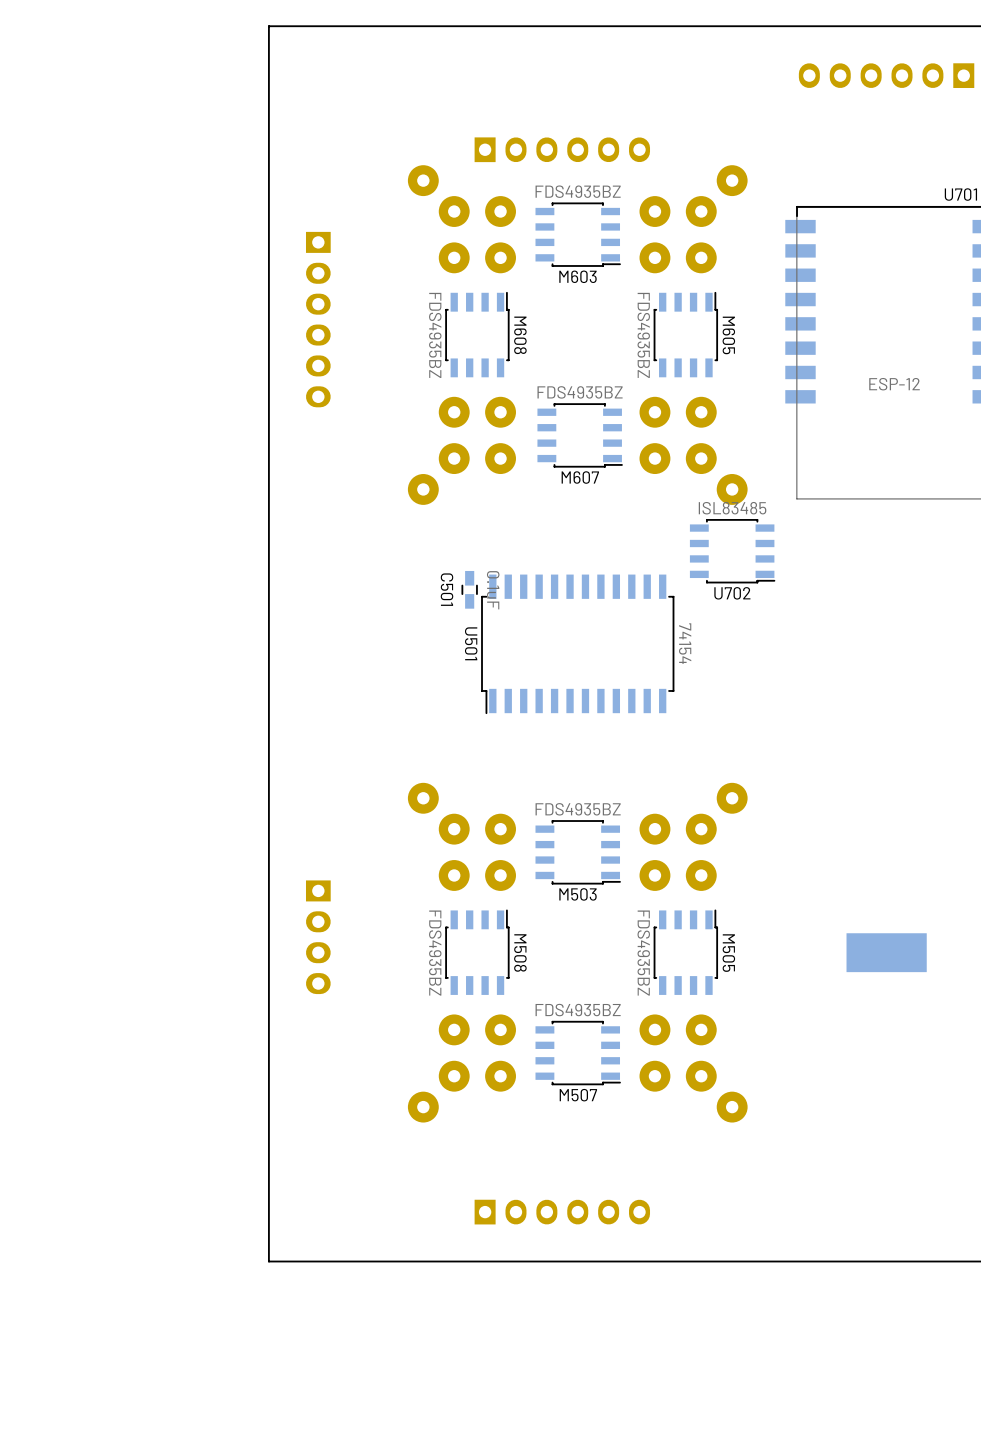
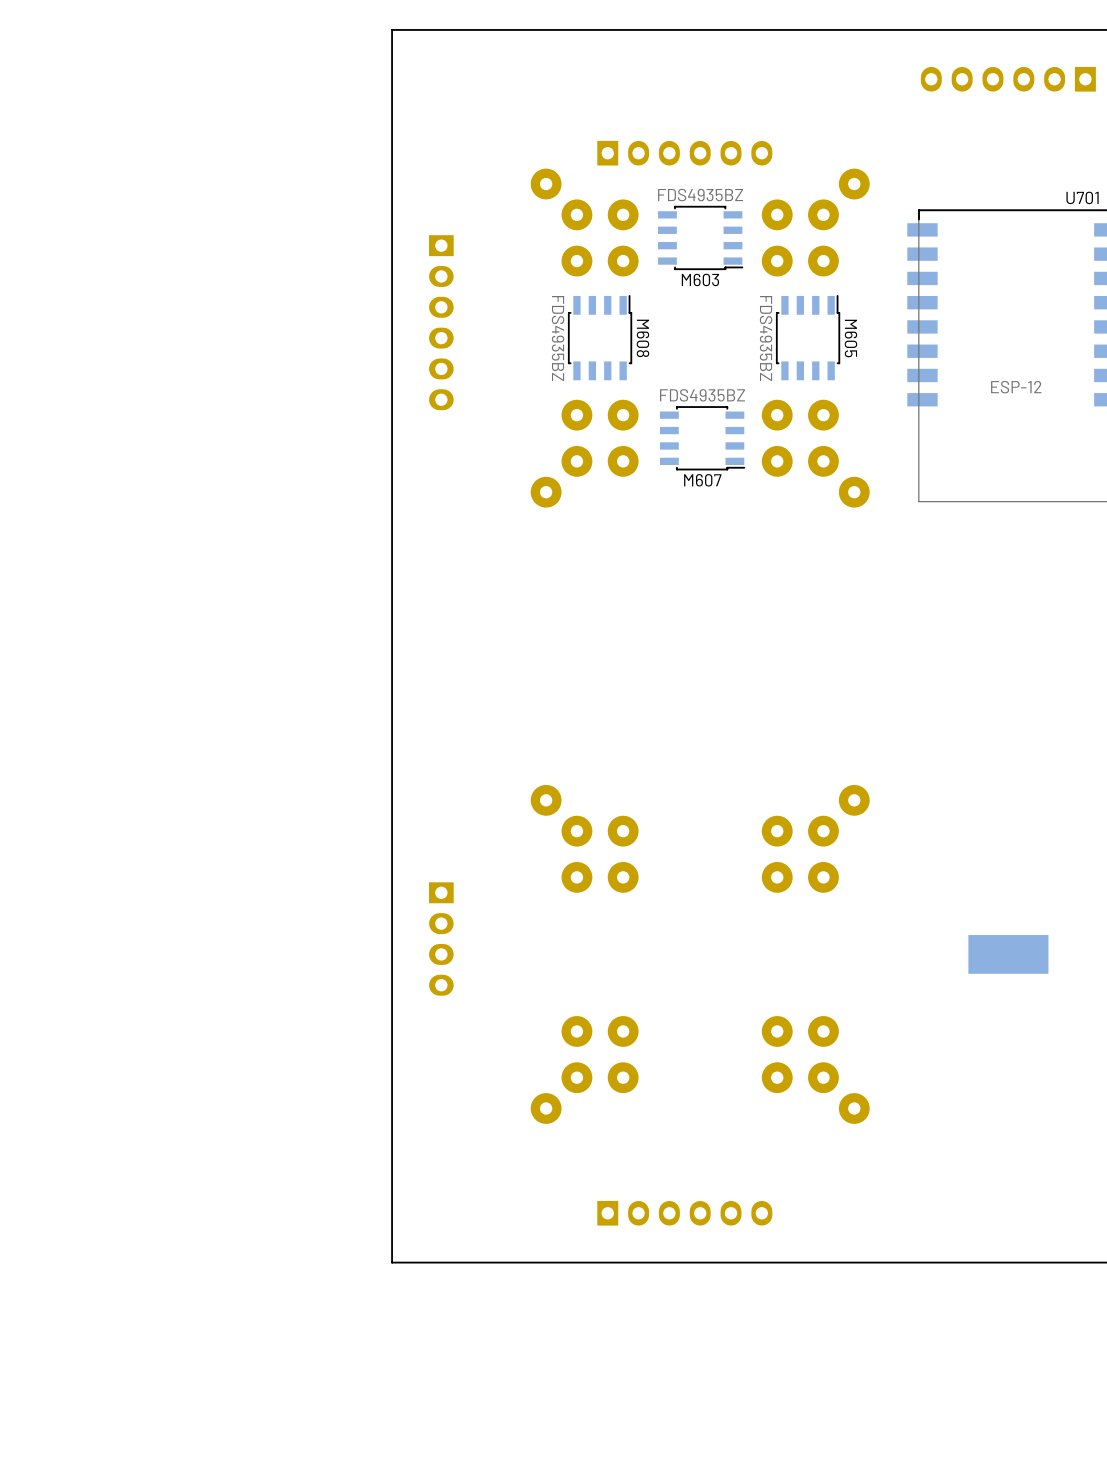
U702: ISL83485 (732, 551) -> none
C501: 0.1uF (469, 589) -> none
U501: 74154 (577, 644) -> none
M503: FDS4935BZ (578, 852) -> none
M508: FDS4935BZ (477, 952) -> none
M505: FDS4935BZ (685, 952) -> none
M507: FDS4935BZ (578, 1053) -> none

